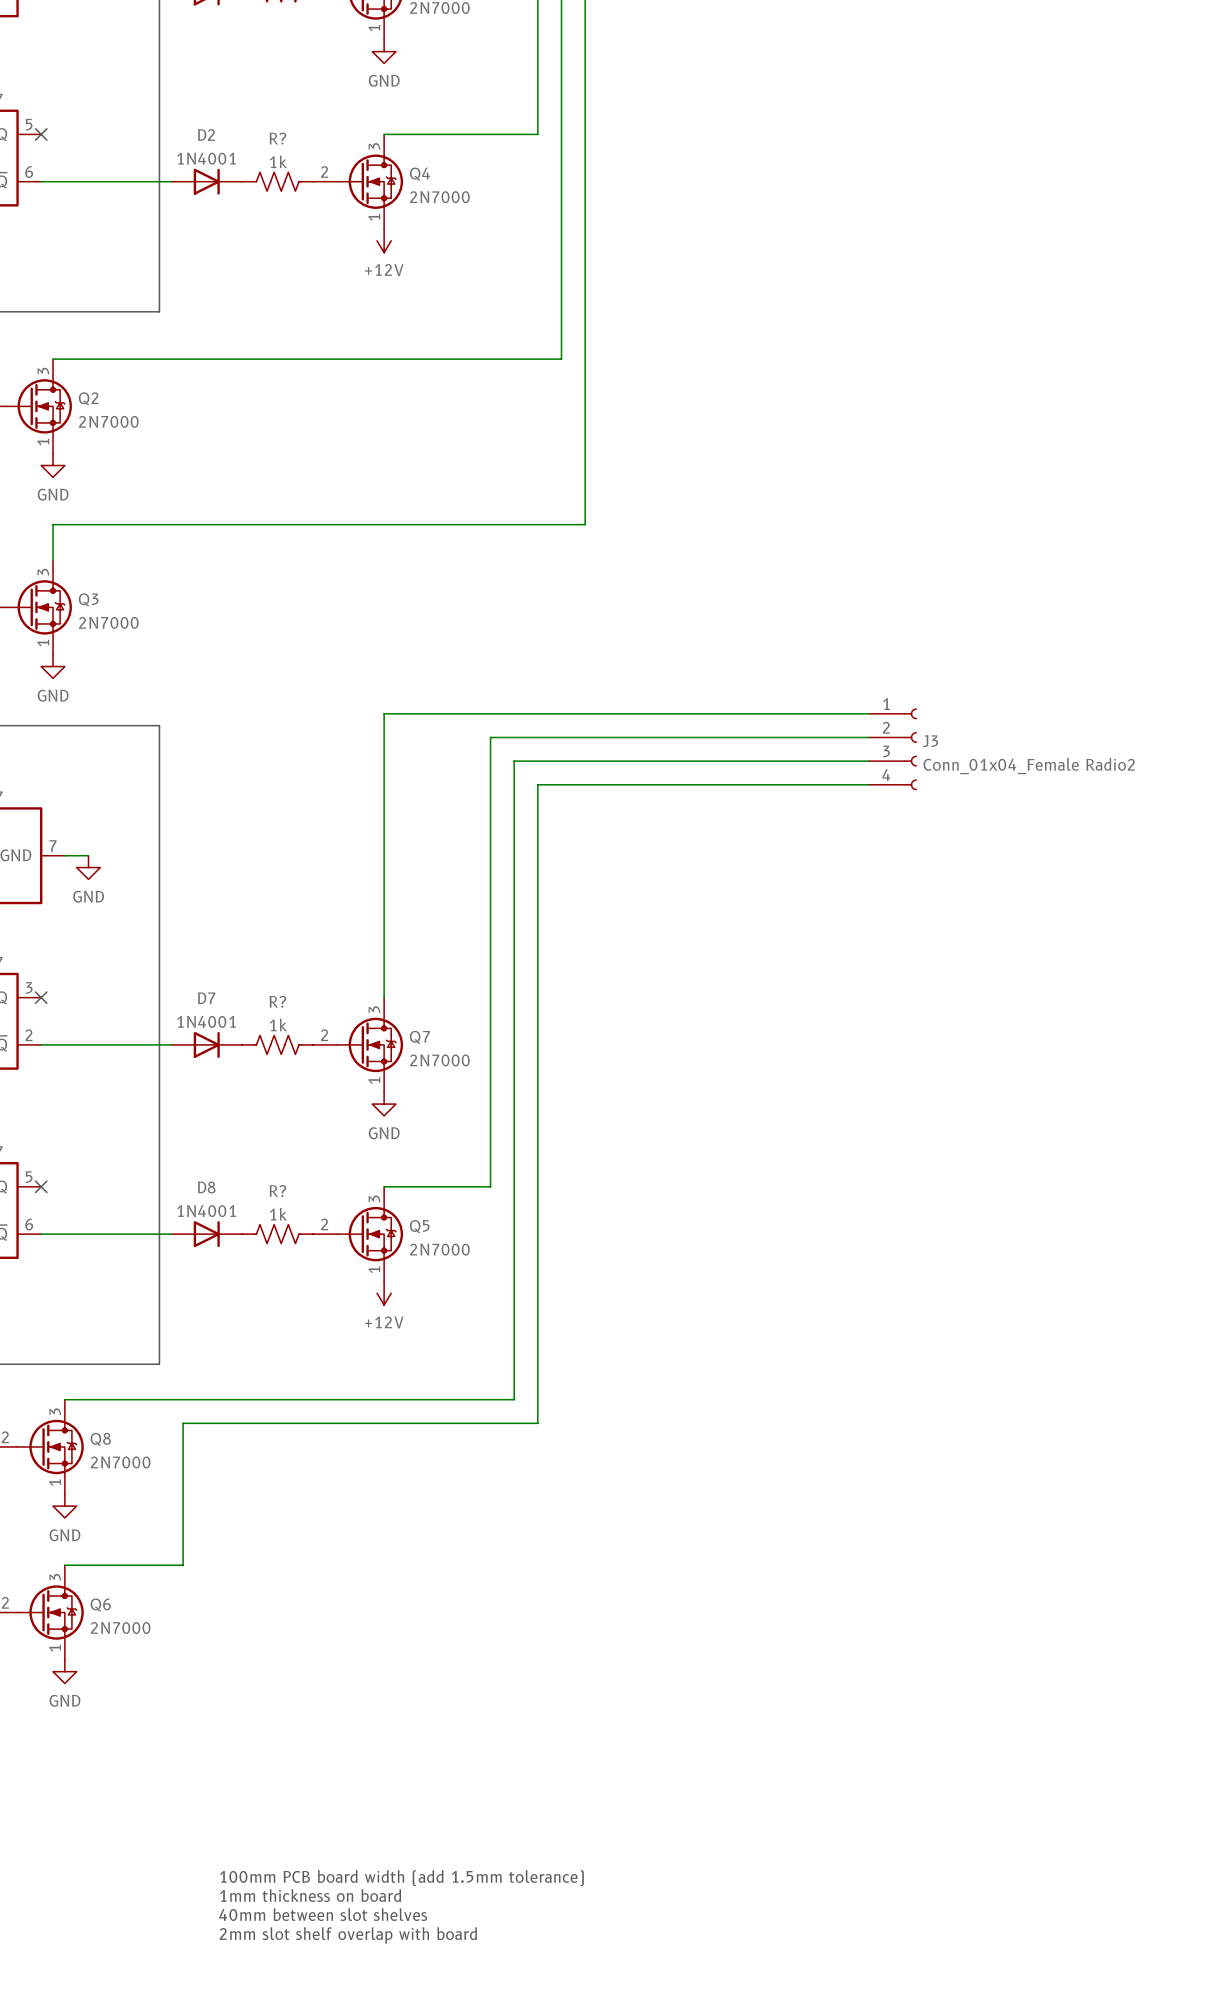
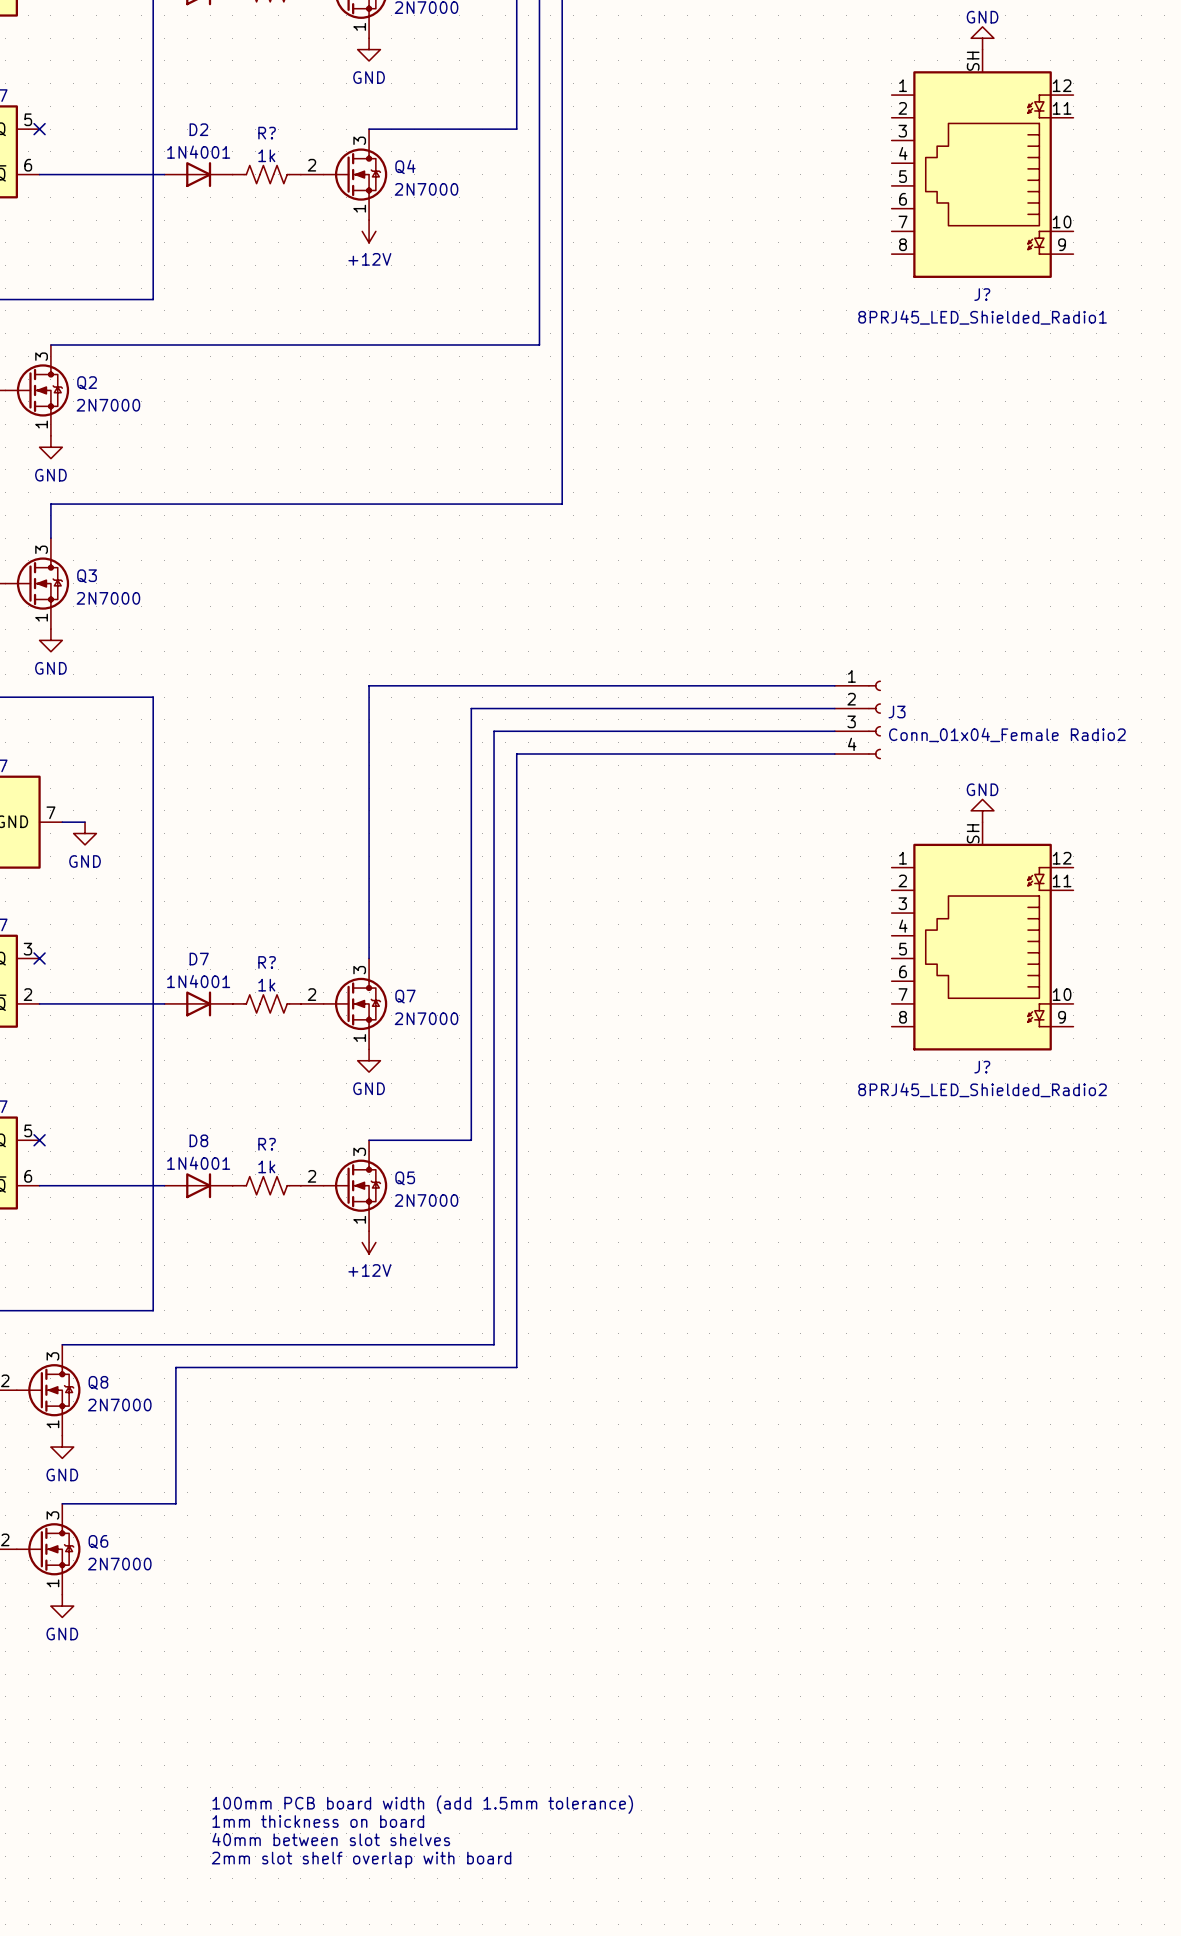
power symbol: none -> GND (982, 38)
J?: none -> 8PRJ45_LED_Shielded_Radio1 (982, 163)
power symbol: none -> GND (982, 810)
J?: none -> 8PRJ45_LED_Shielded_Radio2 (982, 936)

